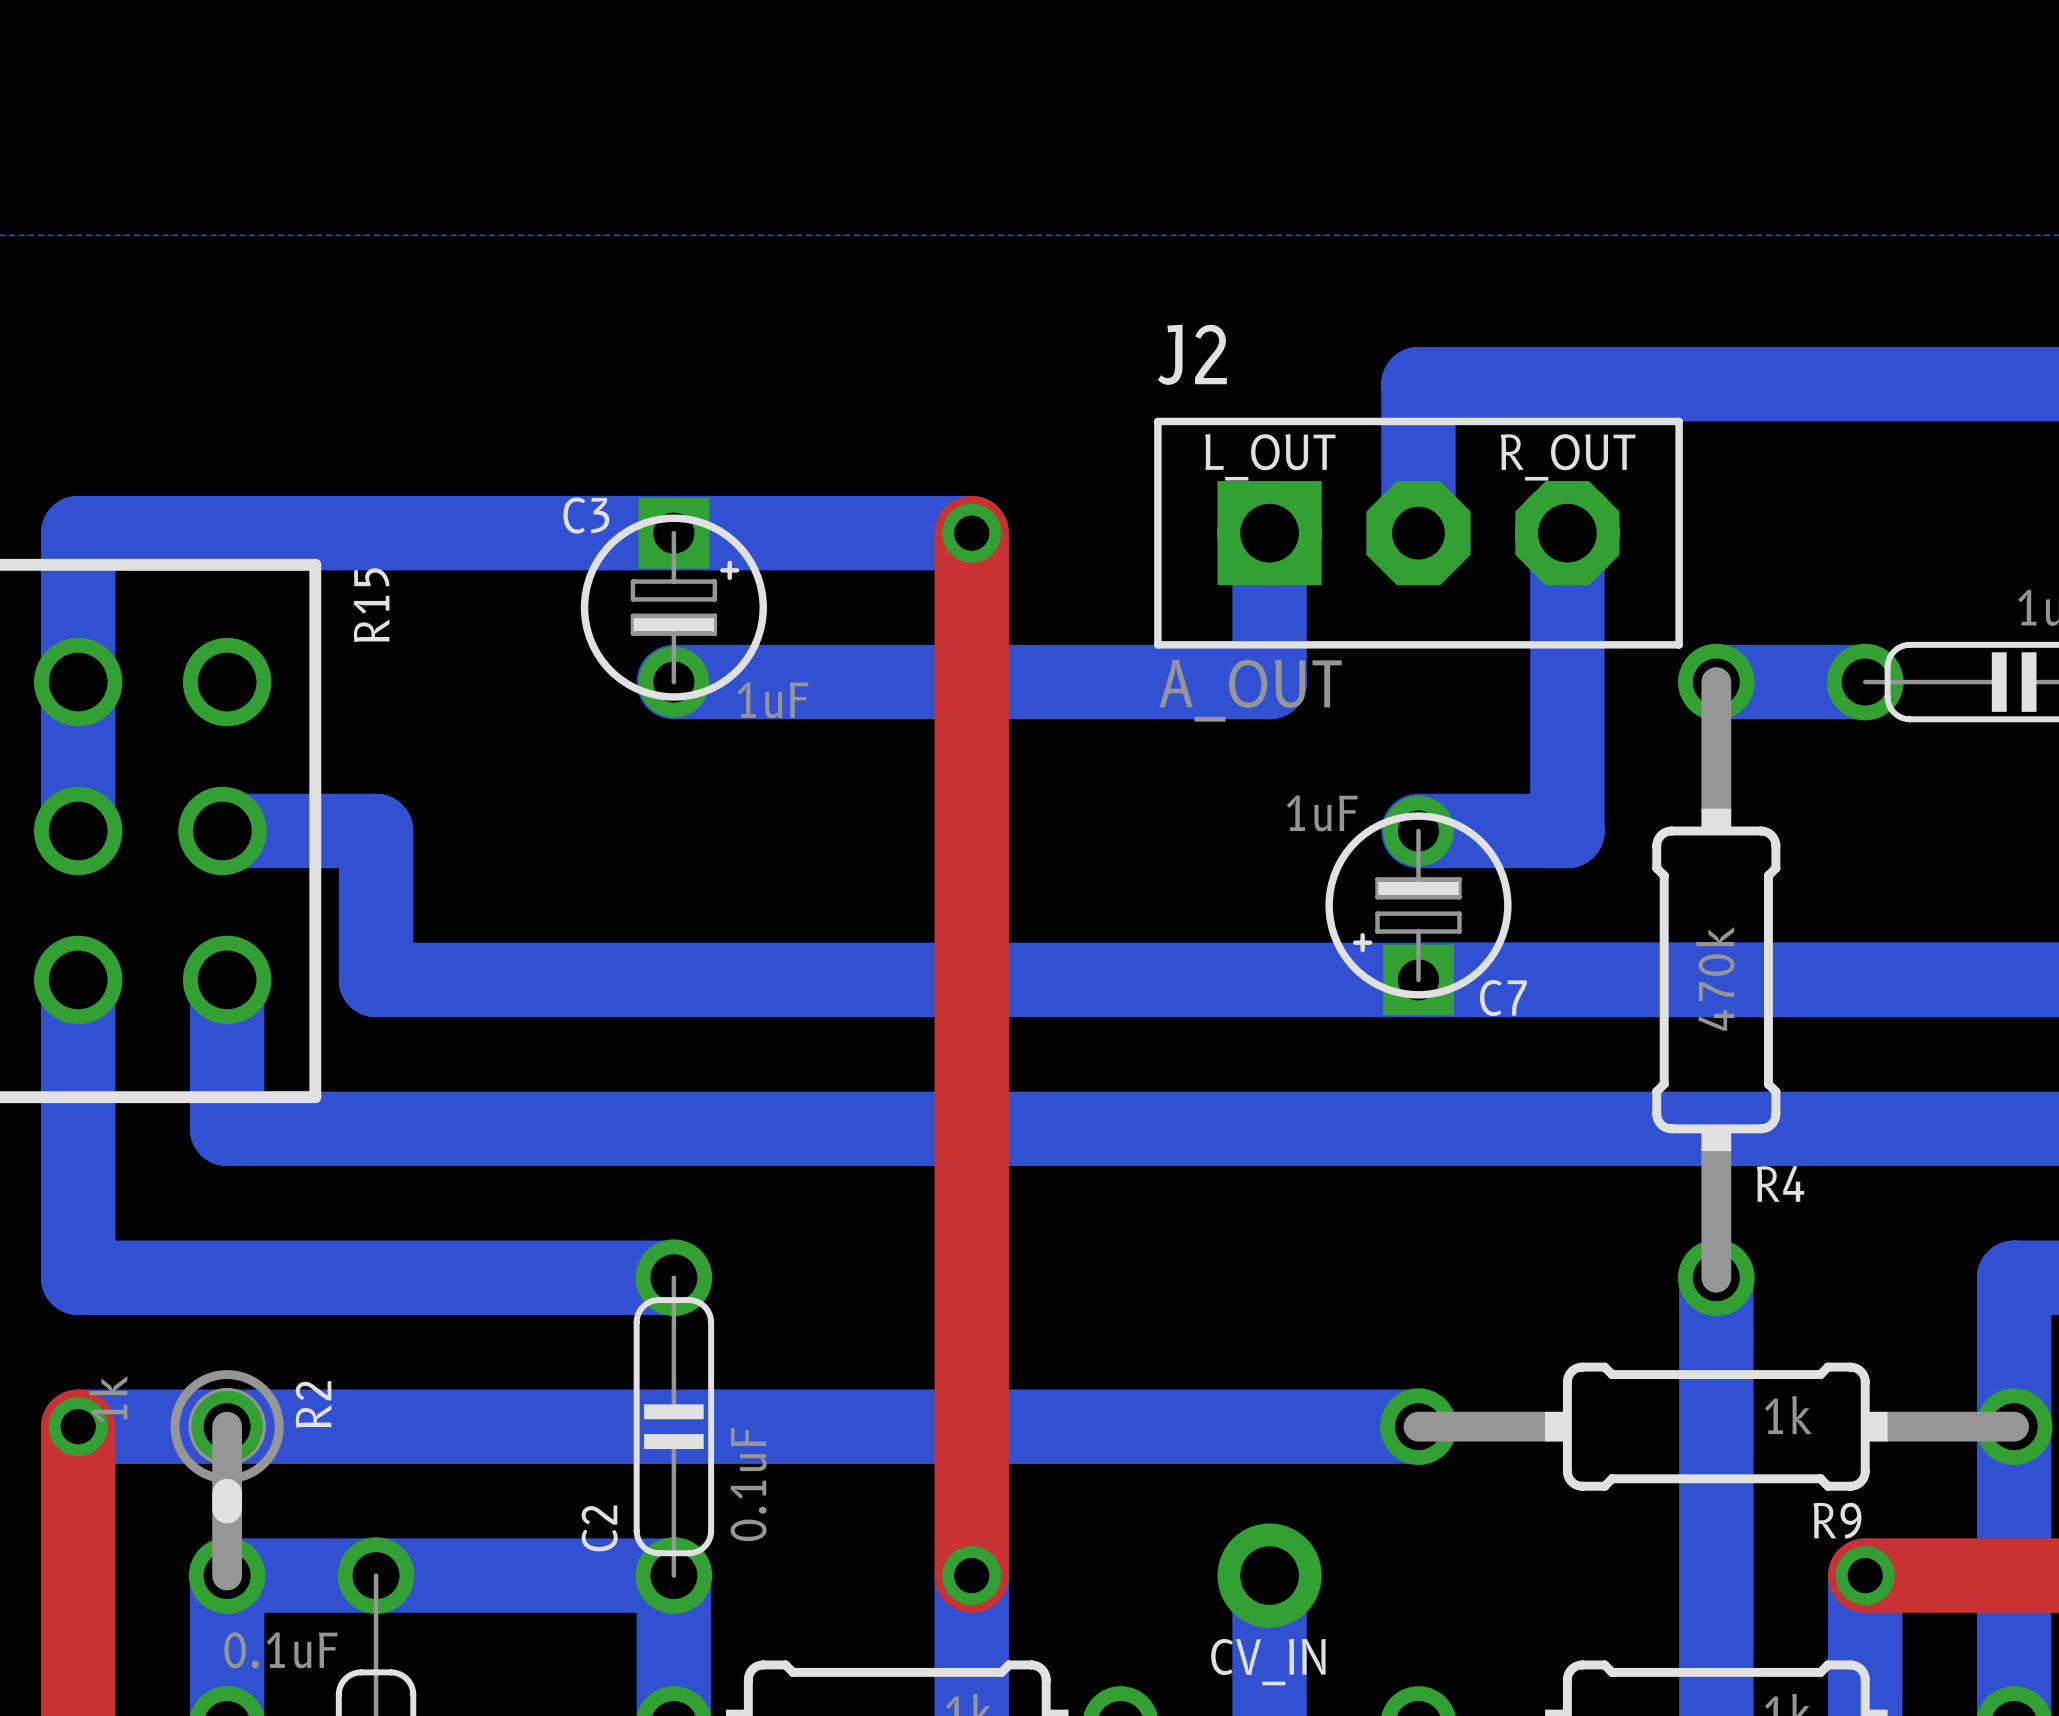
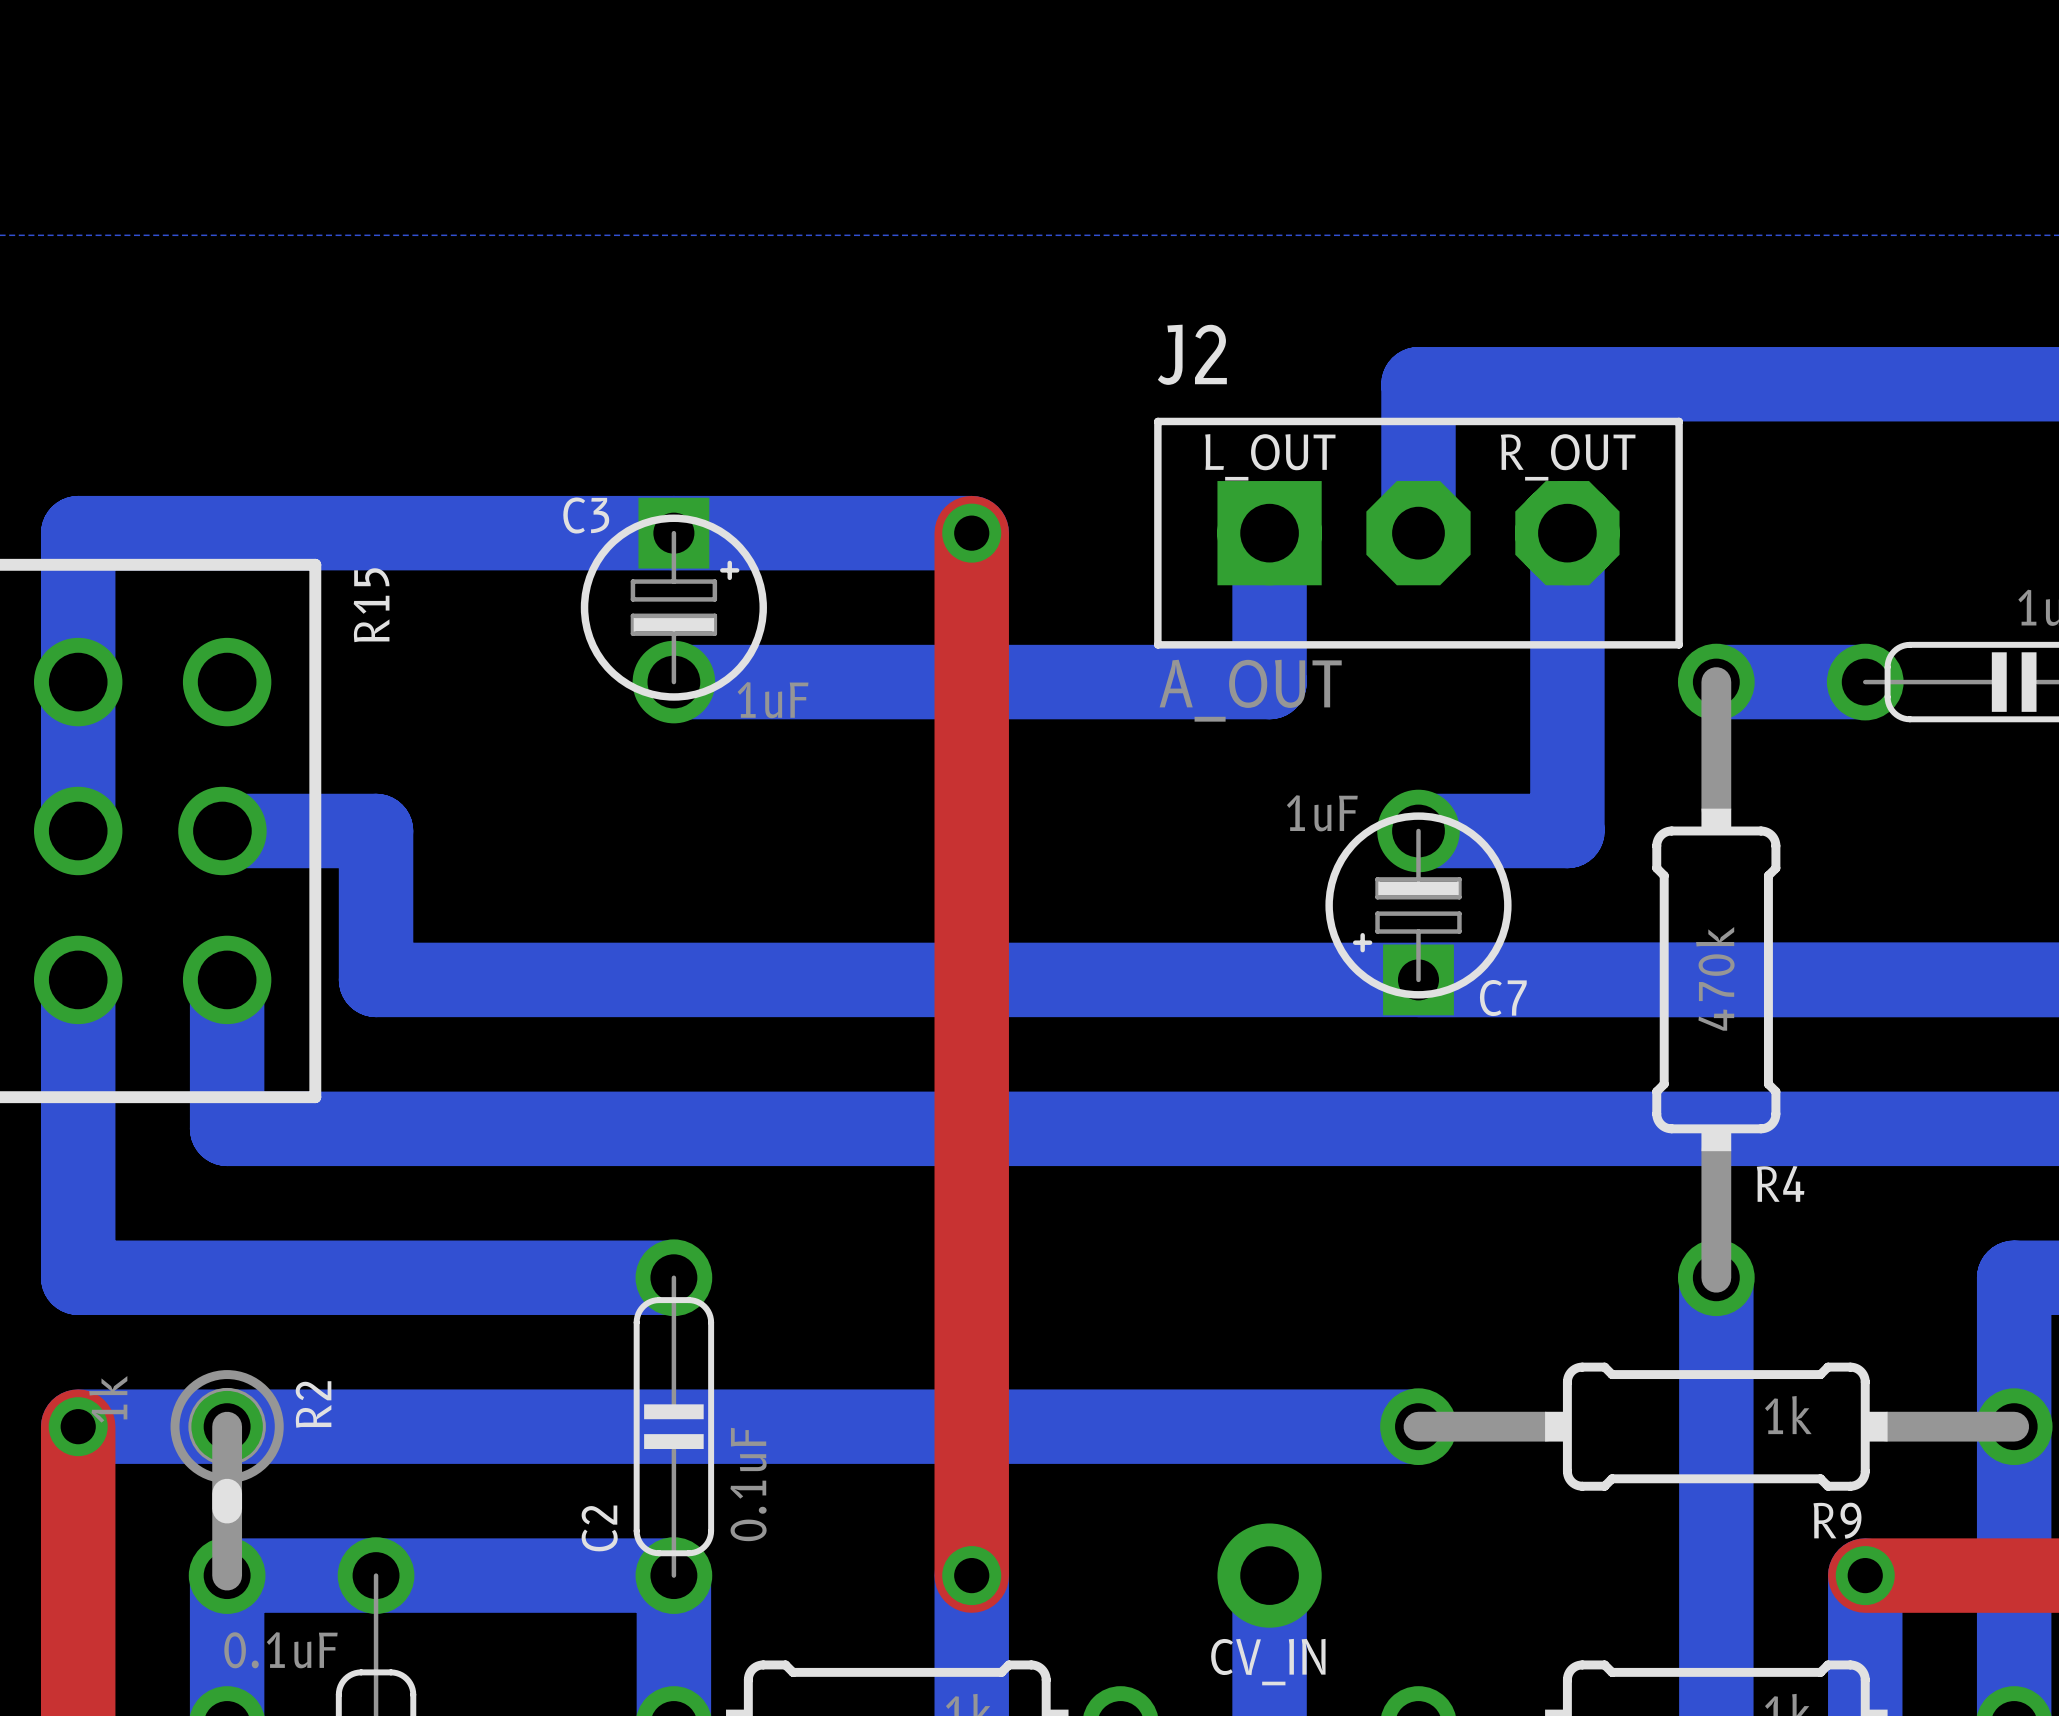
C3 footprint: [580, 497, 767, 718] -> [580, 497, 767, 724]
C7 footprint: [1325, 795, 1512, 1016] -> [1325, 789, 1512, 1016]

